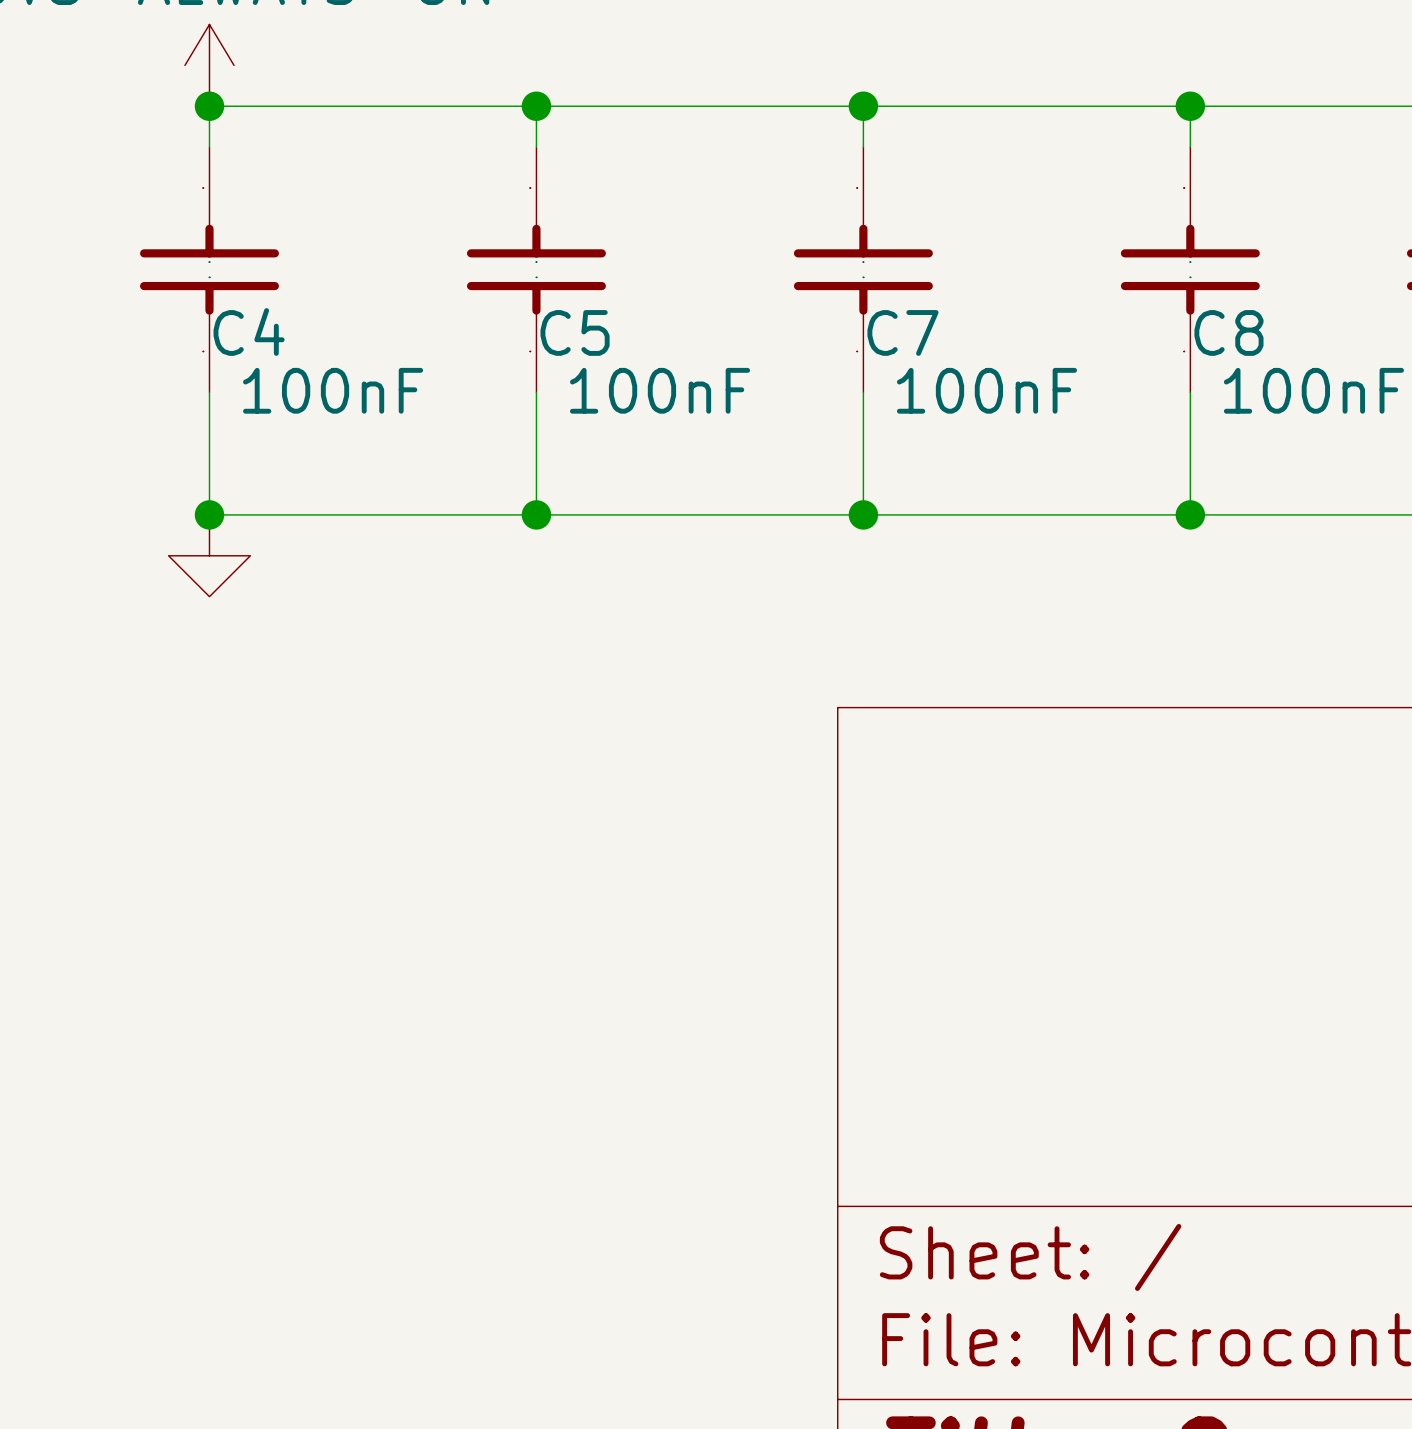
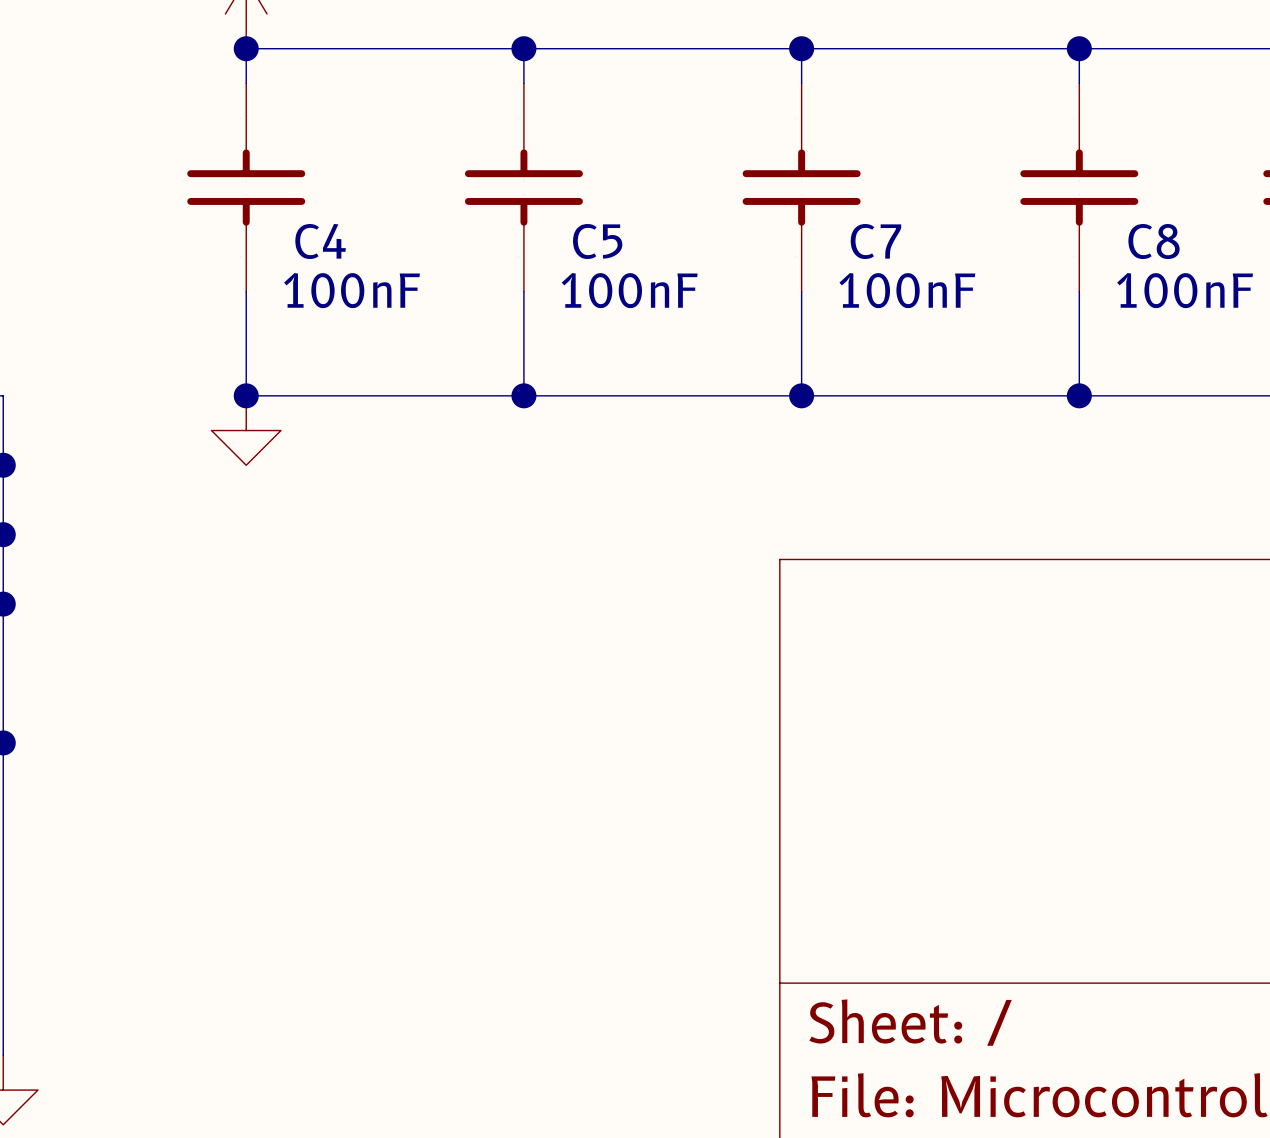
C4 name position: C4 (249, 331) -> C4 (320, 241)
C5 name position: C5 (575, 332) -> C5 (597, 241)
C7 name position: C7 (902, 332) -> C7 (875, 241)
C8 name position: C8 (1228, 332) -> C8 (1154, 241)

